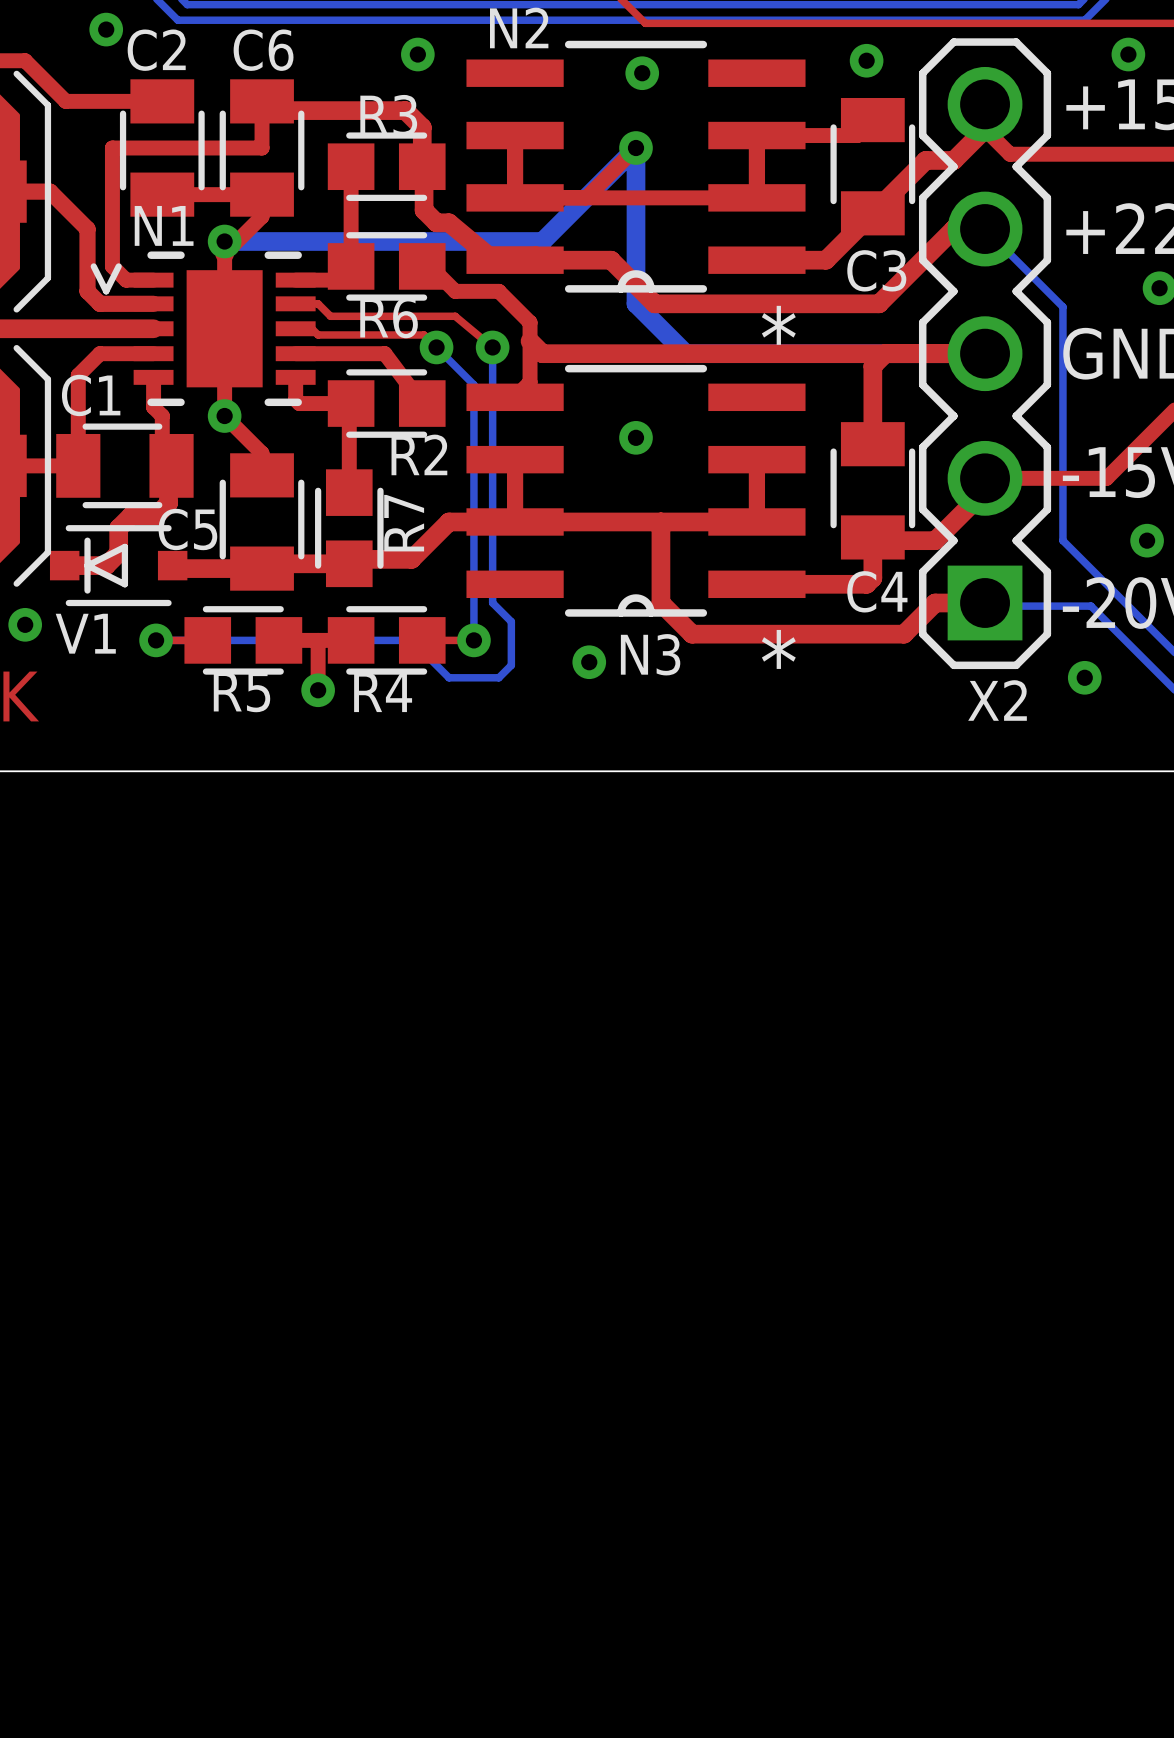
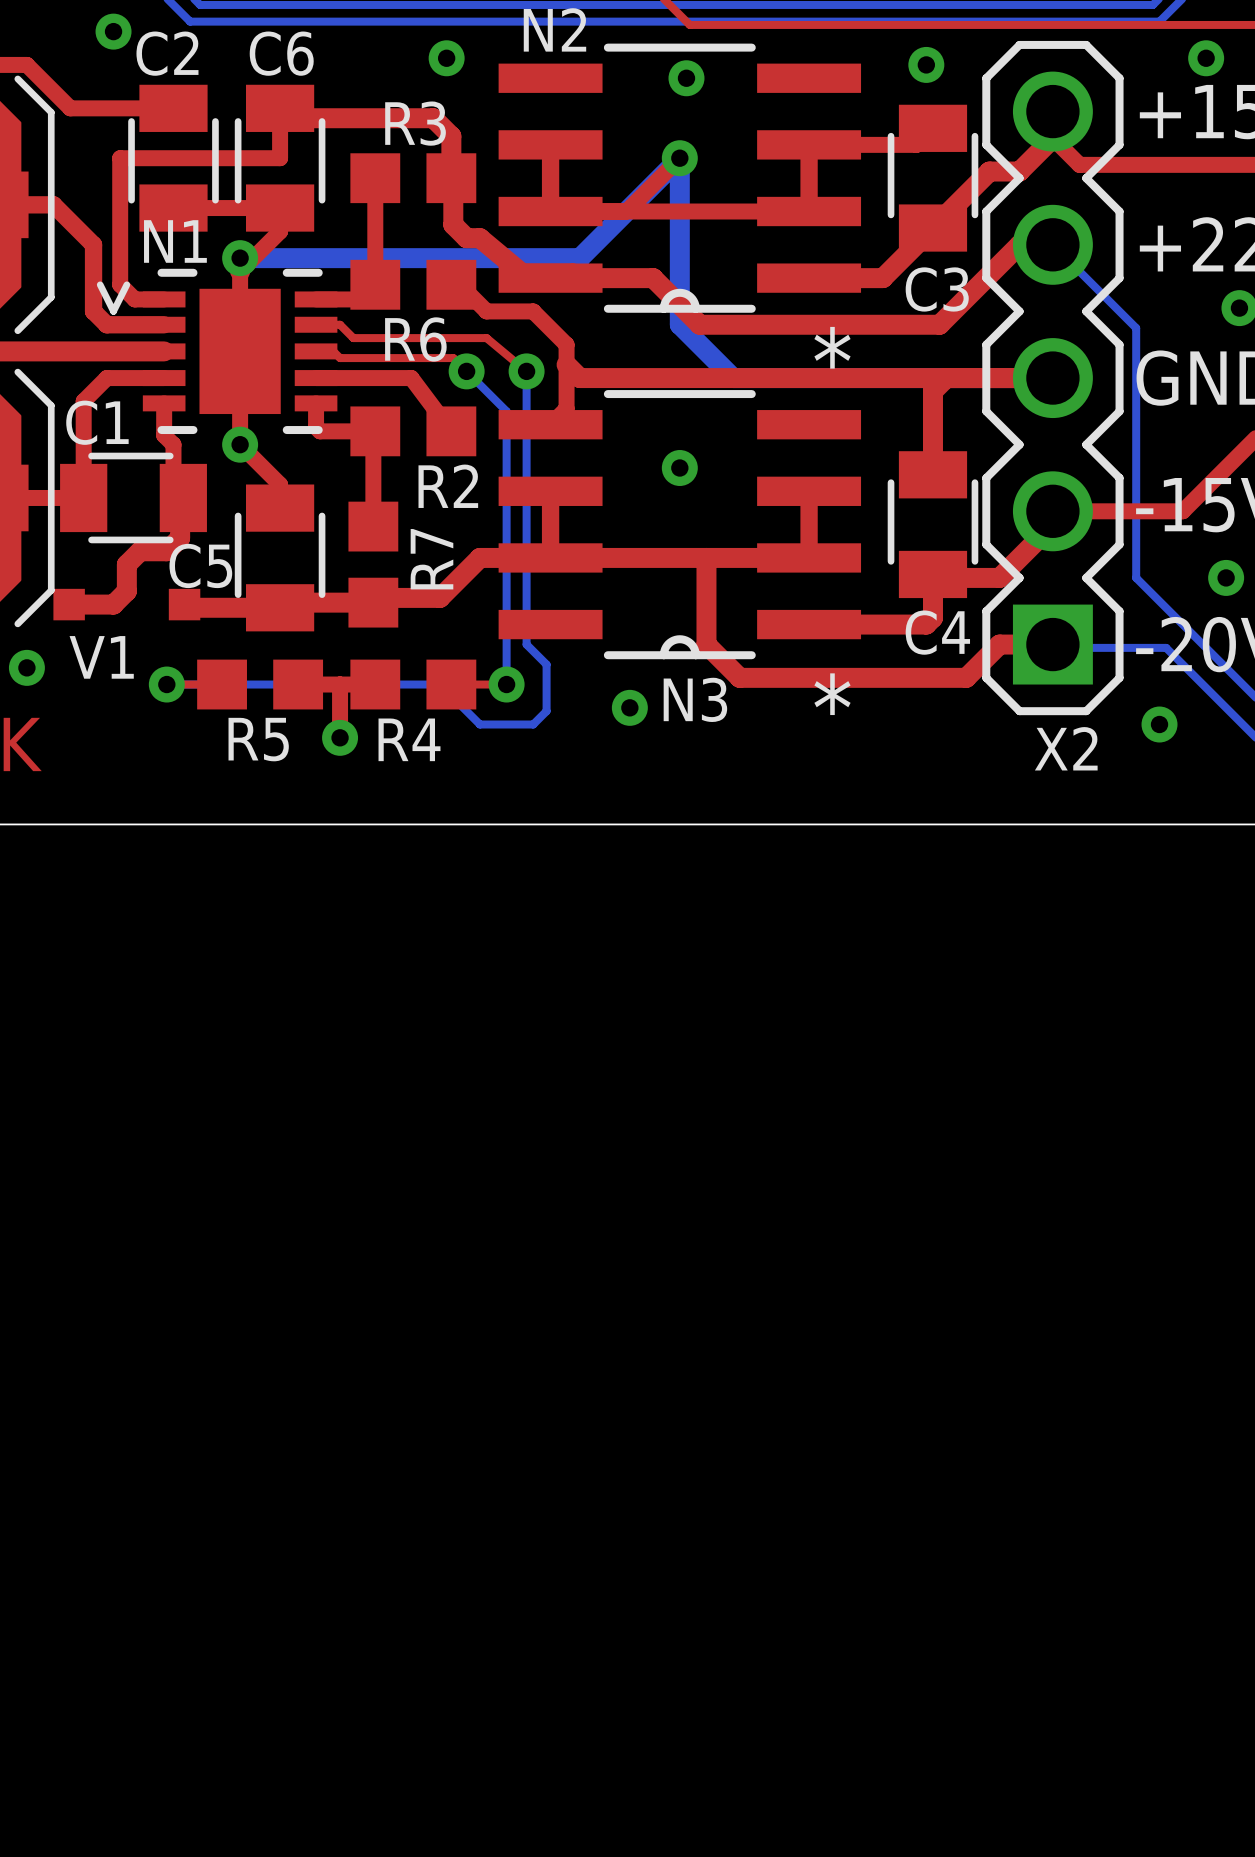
R3 footprint: [327, 132, 446, 201] -> [350, 153, 477, 204]
R6 footprint: [327, 232, 446, 301] -> [350, 259, 477, 310]
R2 footprint: [327, 369, 446, 438] -> [350, 406, 477, 457]
R7 footprint: [315, 469, 384, 588] -> [348, 501, 399, 628]
V1 footprint: [49, 525, 188, 607] -> [53, 588, 201, 621]
R5 footprint: [184, 606, 303, 675] -> [197, 659, 324, 710]
R4 footprint: [327, 606, 446, 675] -> [350, 659, 477, 710]

